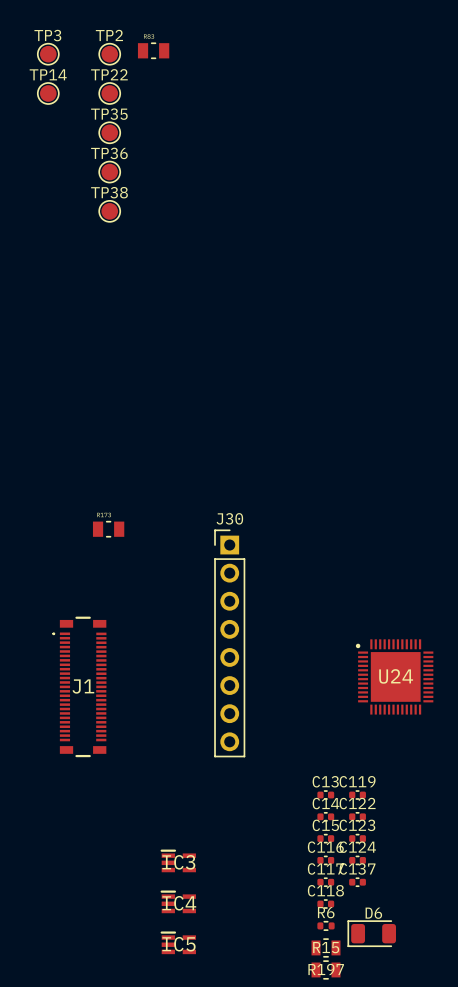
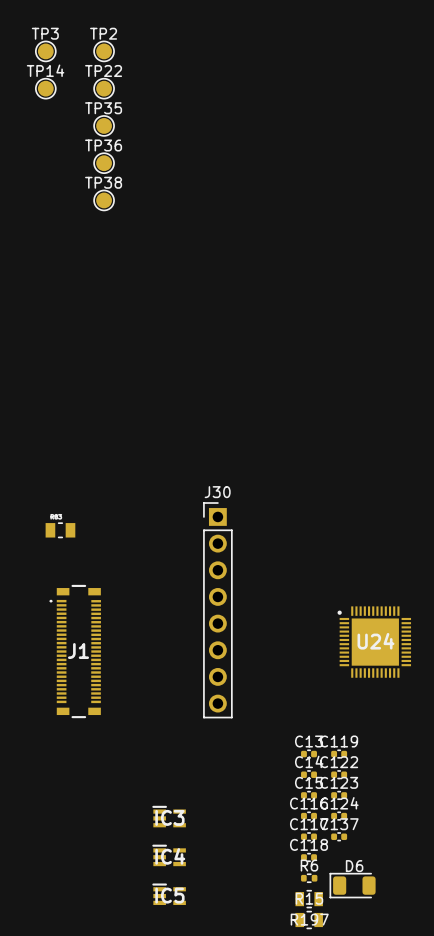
part position: (153, 50) -> (60, 530)
part: (108, 529) -> none

